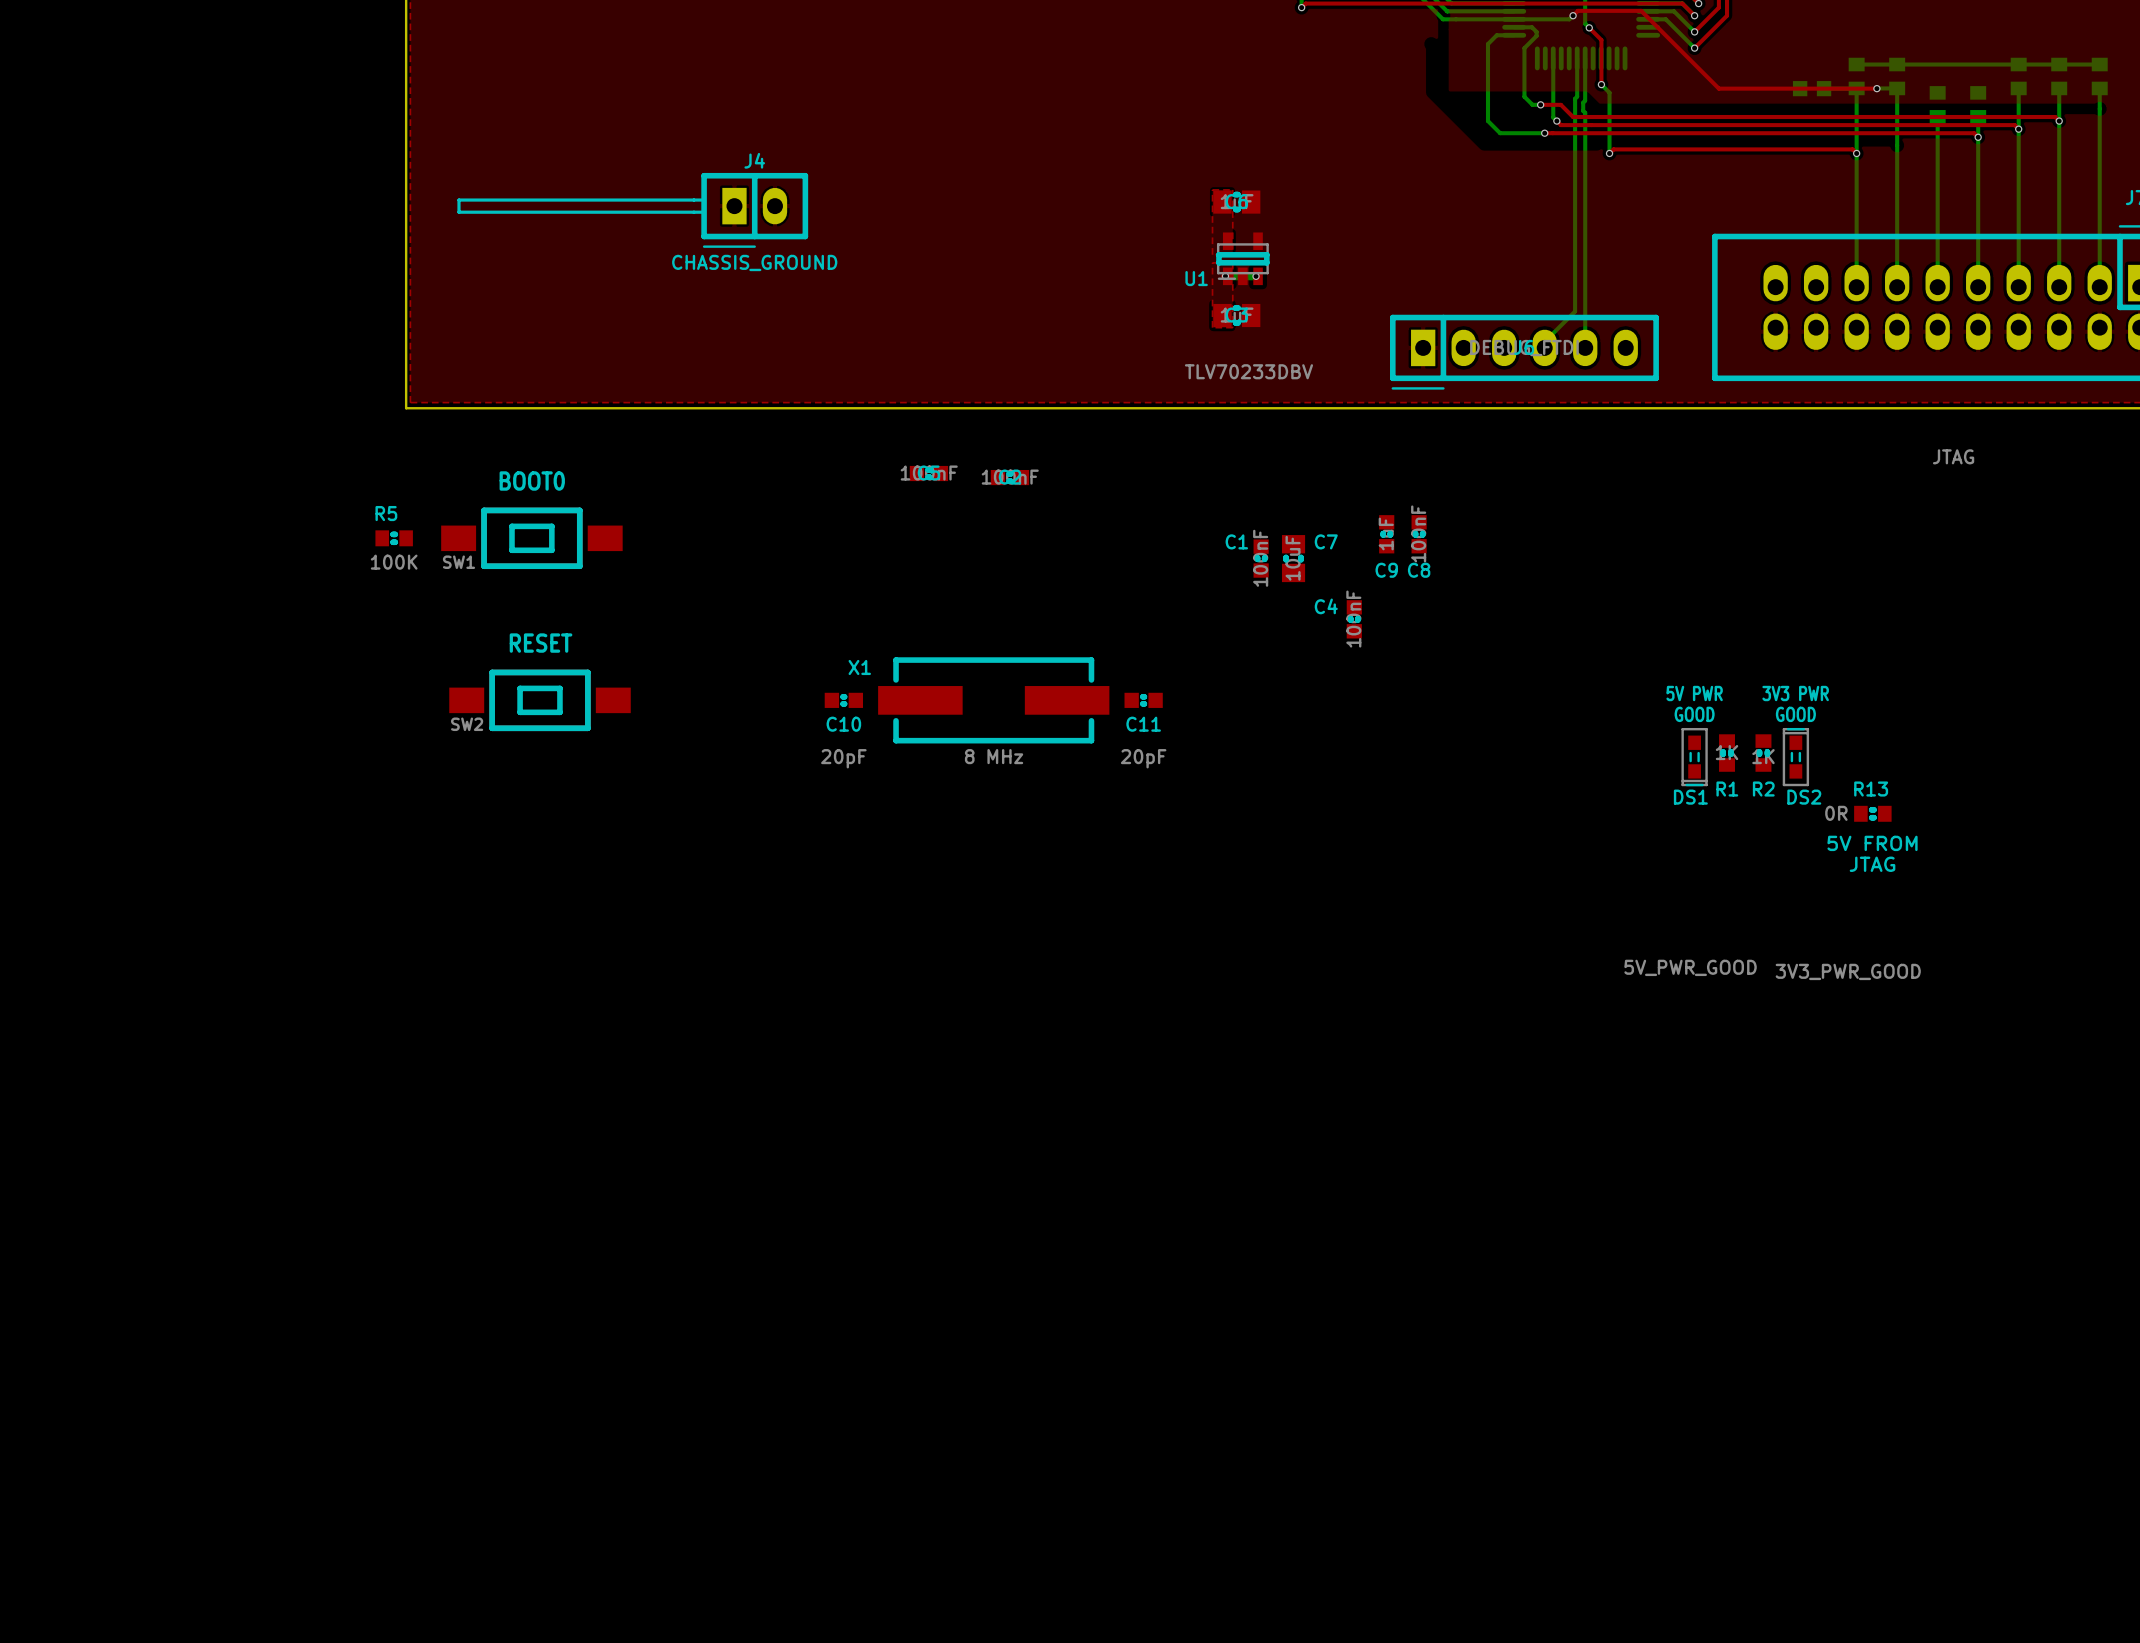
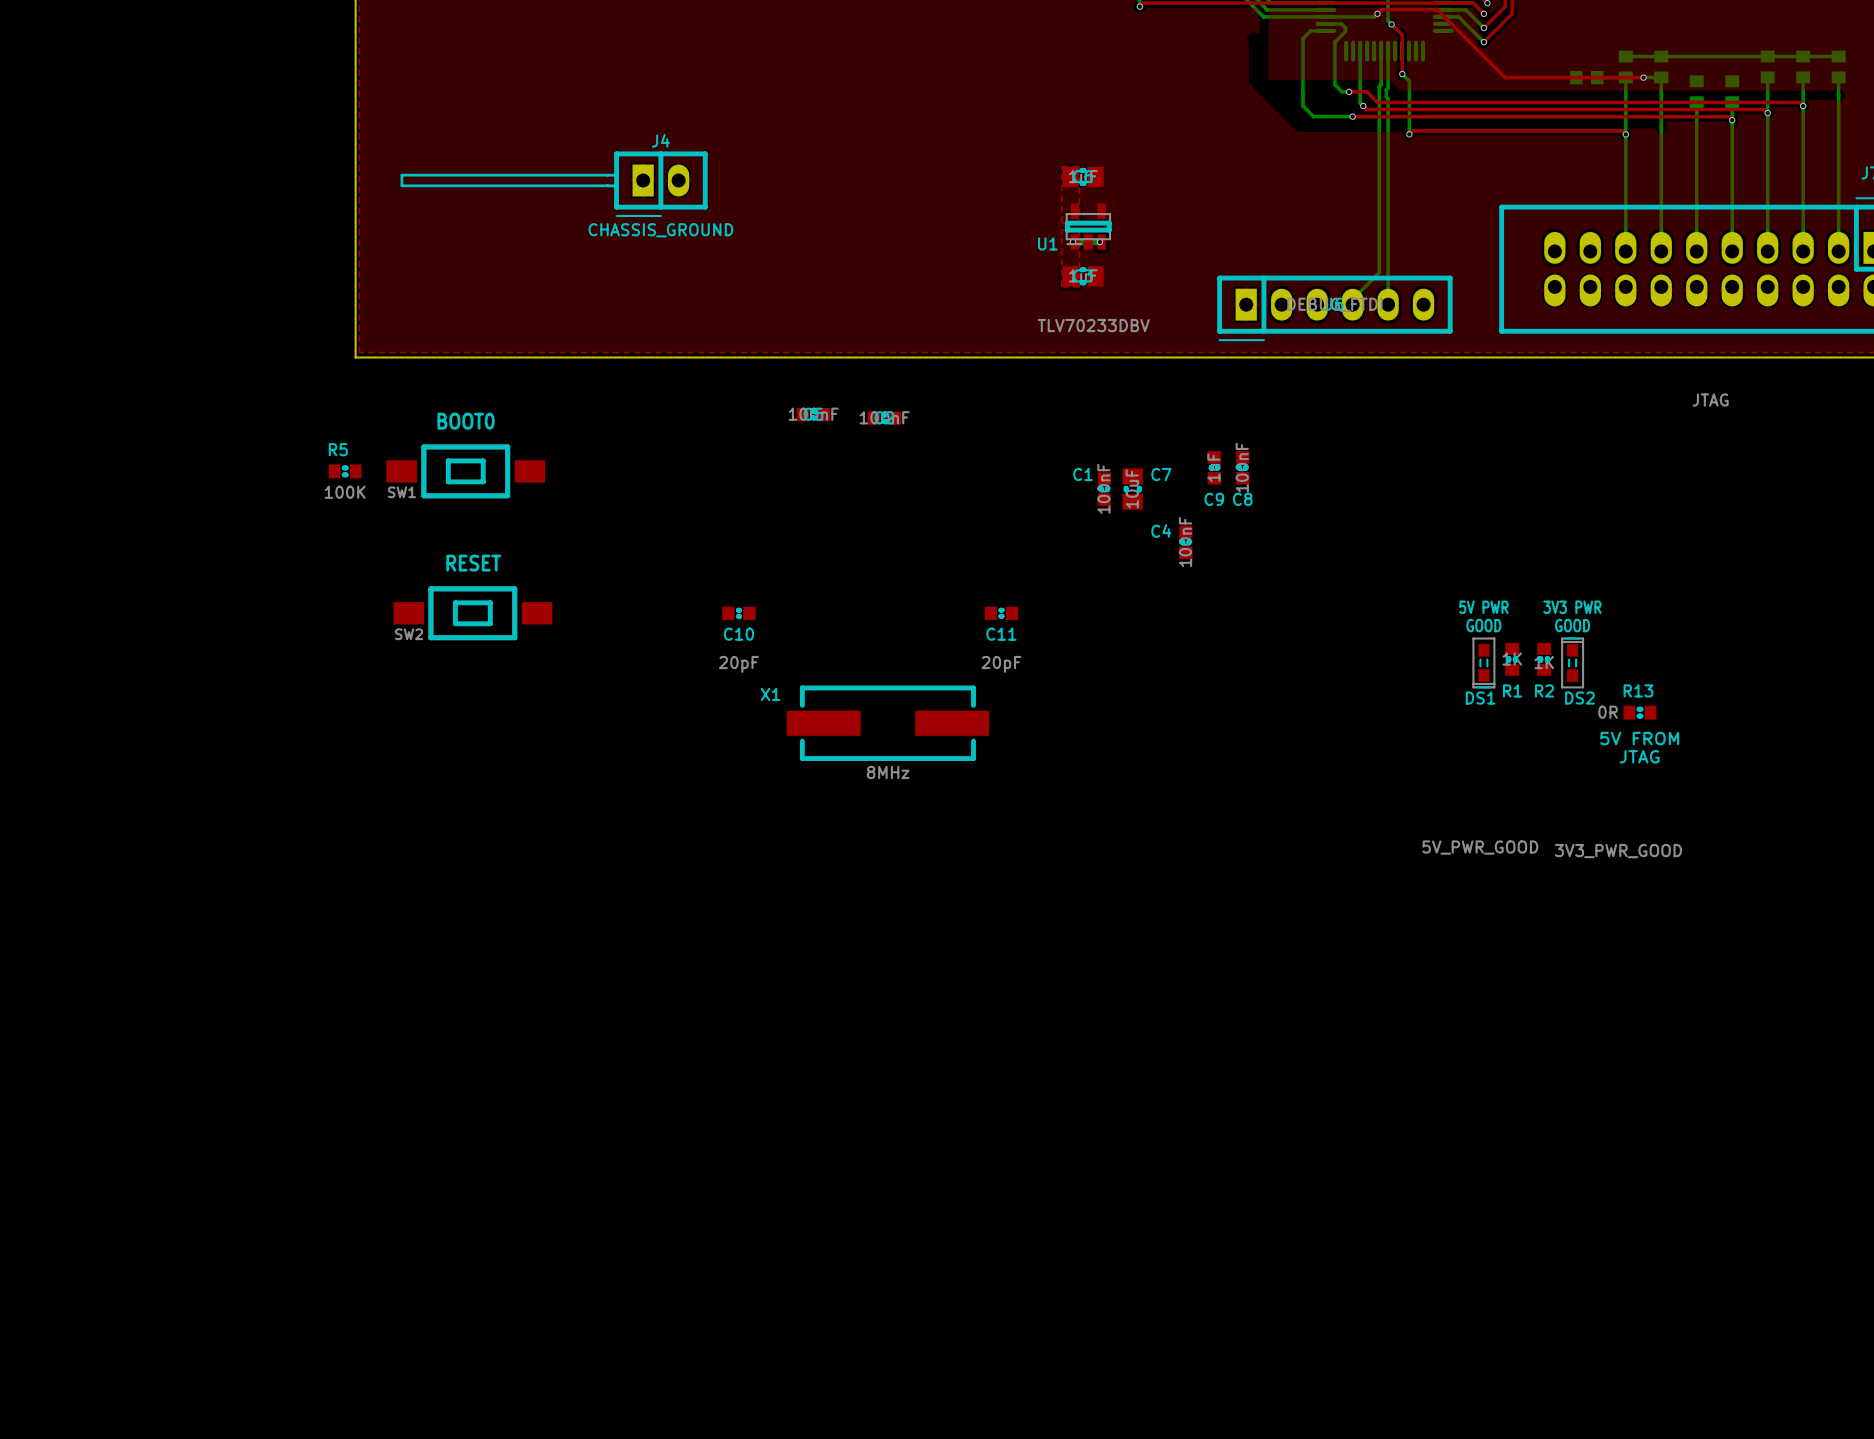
X1 position: (993, 700) -> (887, 723)
X1 value: 8 MHz (994, 756) -> 8MHz (888, 772)

